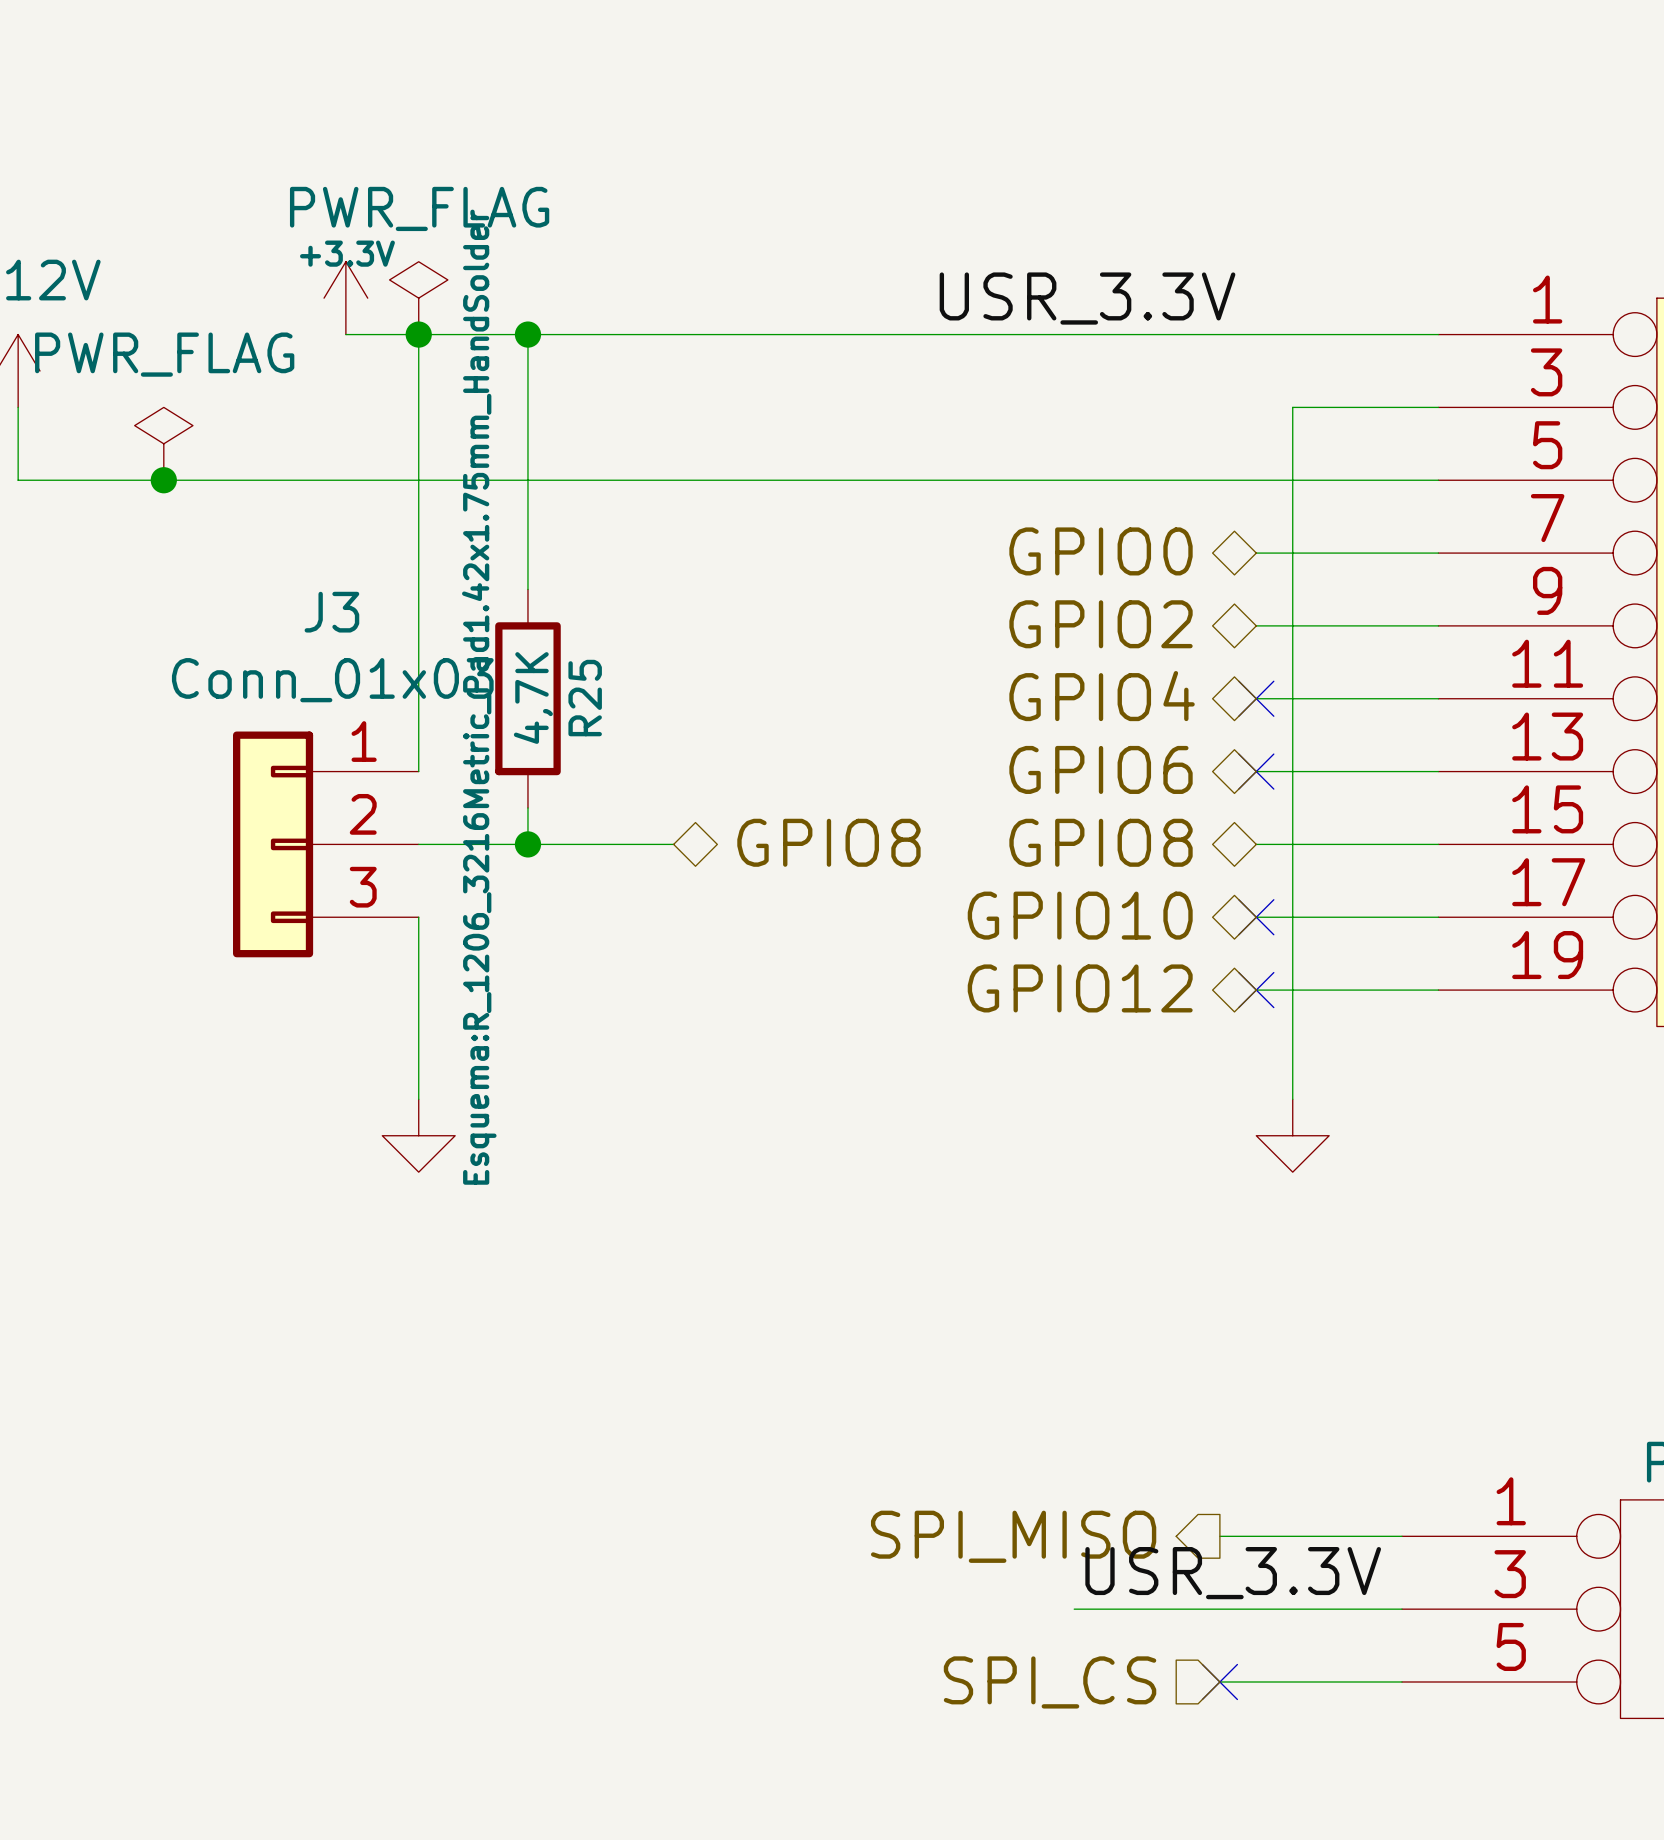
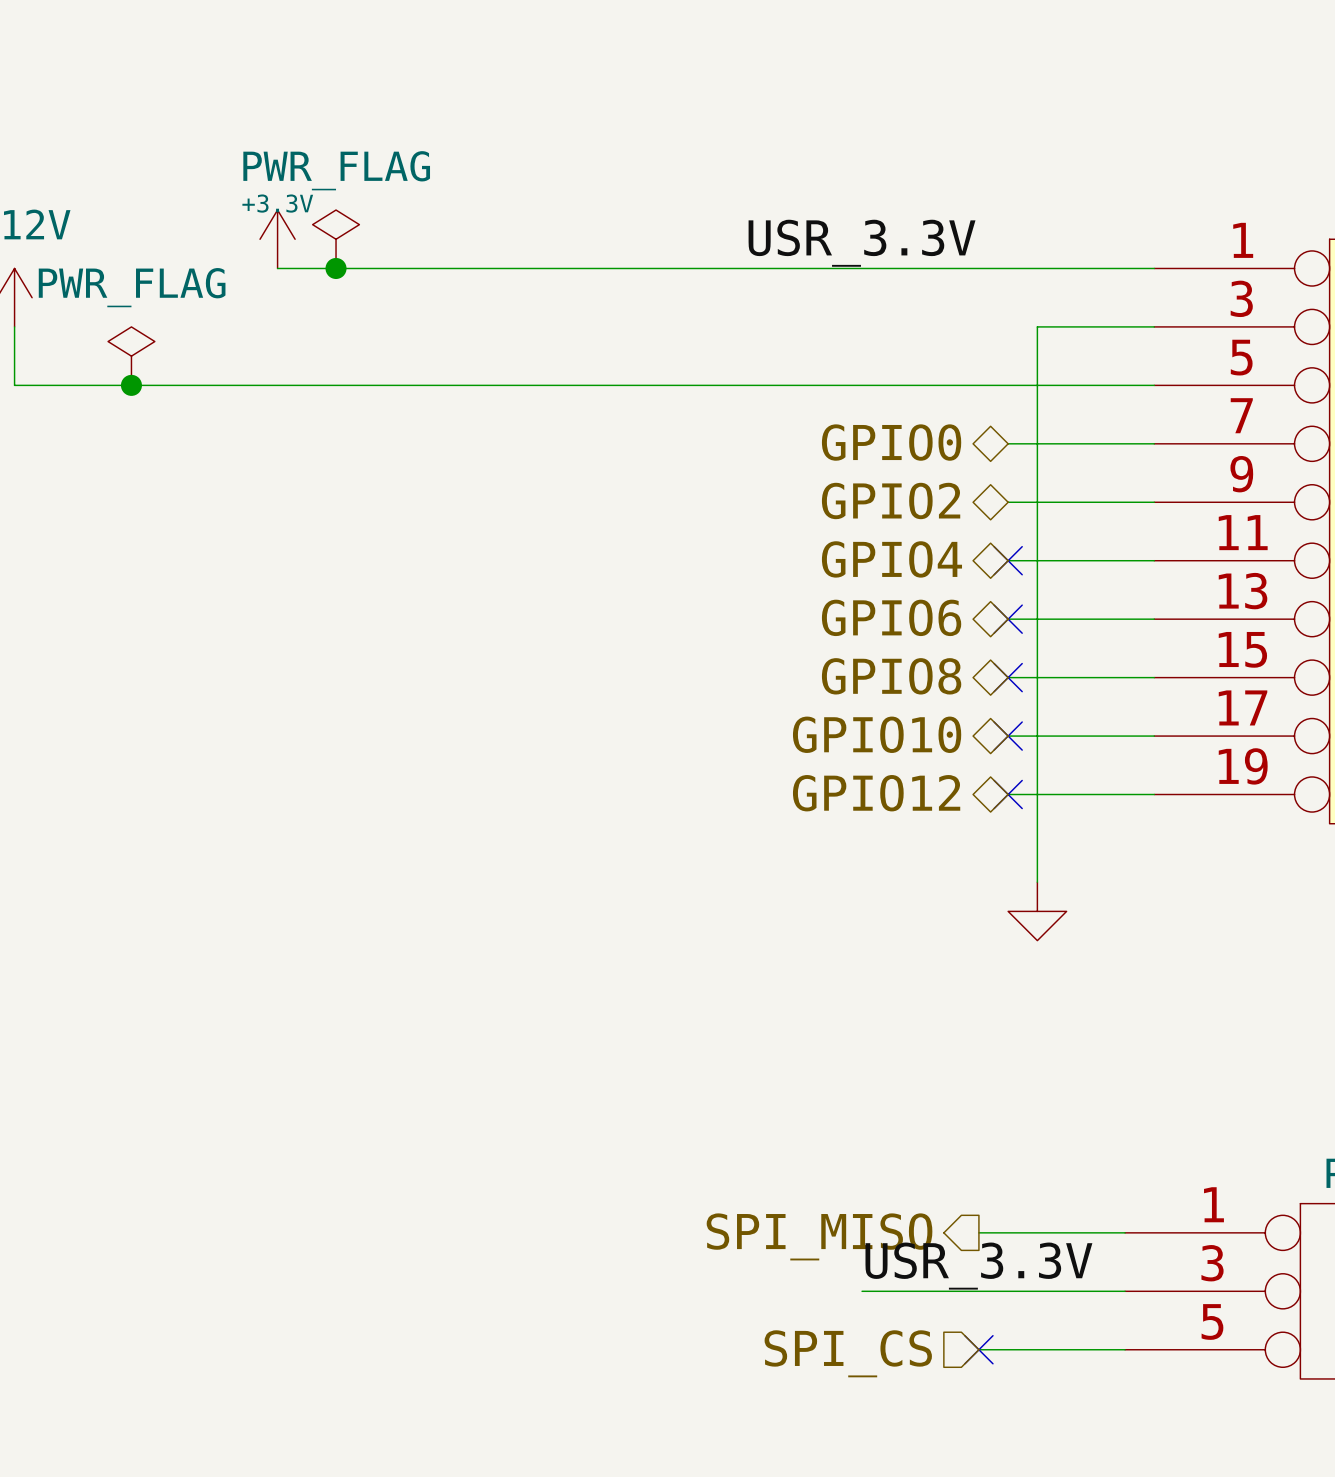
wire: (418, 334) (418, 771) -> none
wire: (527, 334) (527, 589) -> none
junction: (527, 334) -> none
R25: 4,7K (527, 698) -> none
wire: (527, 807) (527, 844) -> none
hierarchical label: GPIO8 (828, 842) -> none
J3: Conn_01x03 (325, 844) -> none
wire: (418, 844) (673, 844) -> none
junction: (527, 844) -> none
no-connect mark: none -> (1008, 677)
wire: (418, 917) (418, 1099) -> none
power symbol: (418, 1135) -> none

